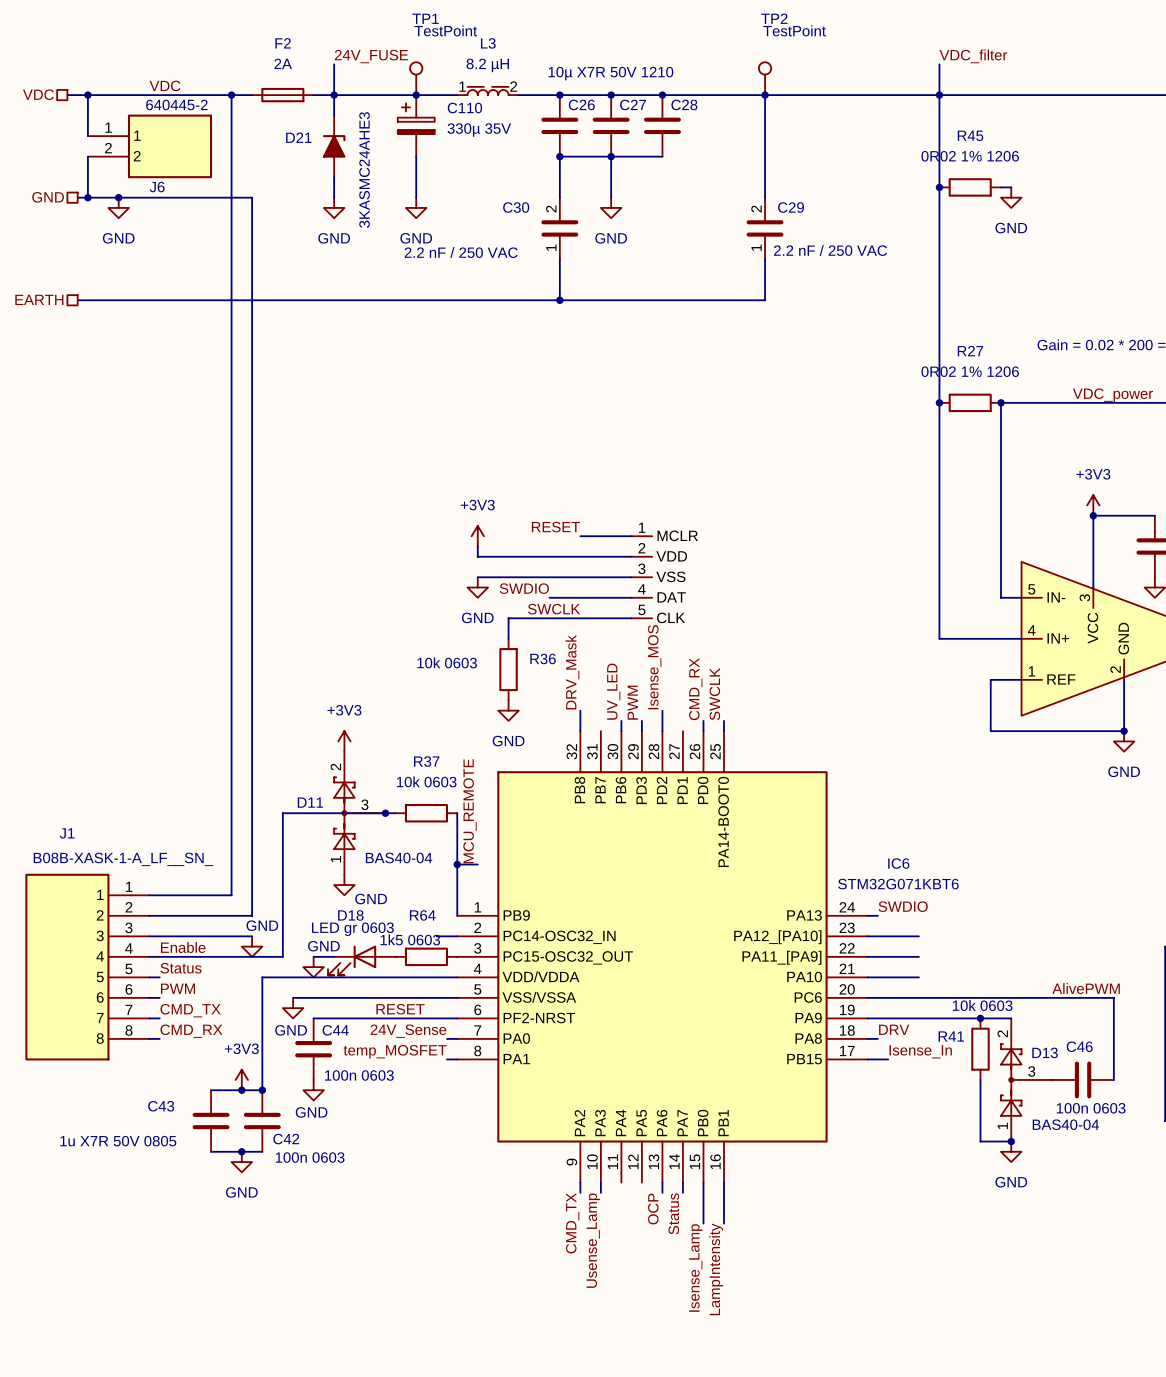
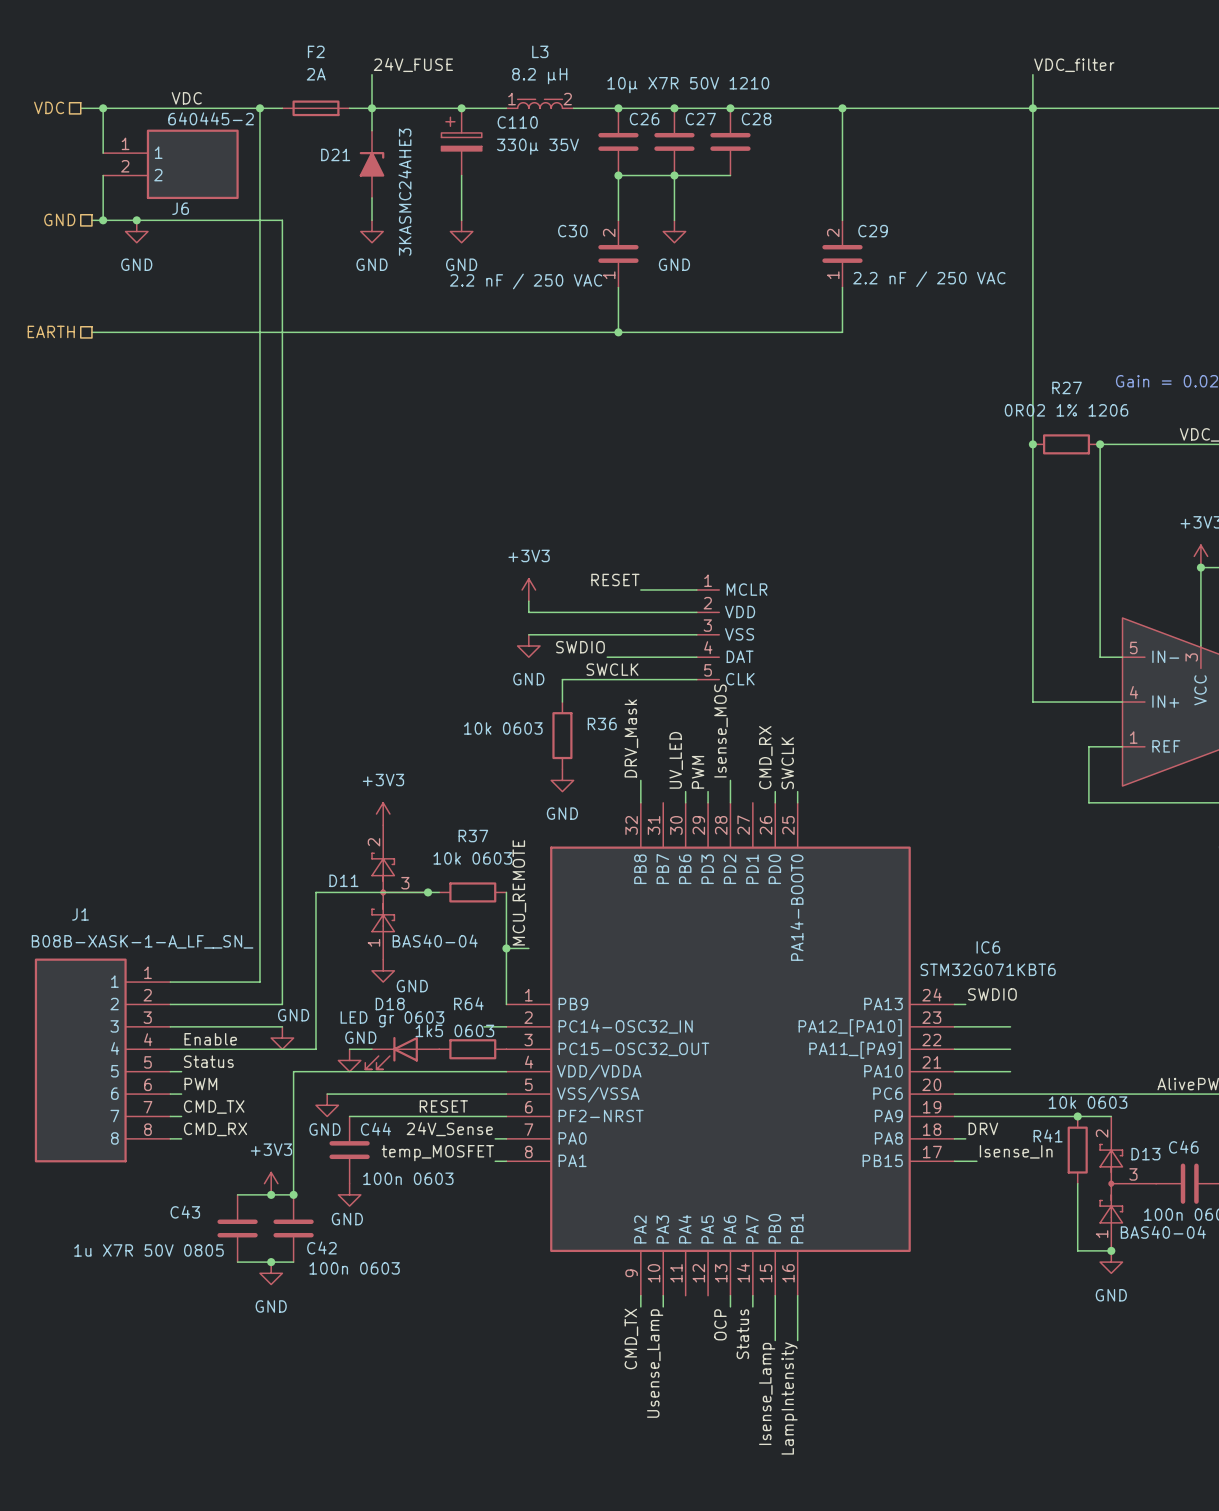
TP1: TestPoint (416, 78) -> none
TP2: TestPoint (765, 78) -> none
junction: (939, 187) -> none
R45: 0R02 1% 1206 (970, 187) -> none
wire: (1001, 187) (1011, 187) -> none
power symbol: GND (1011, 197) -> none

